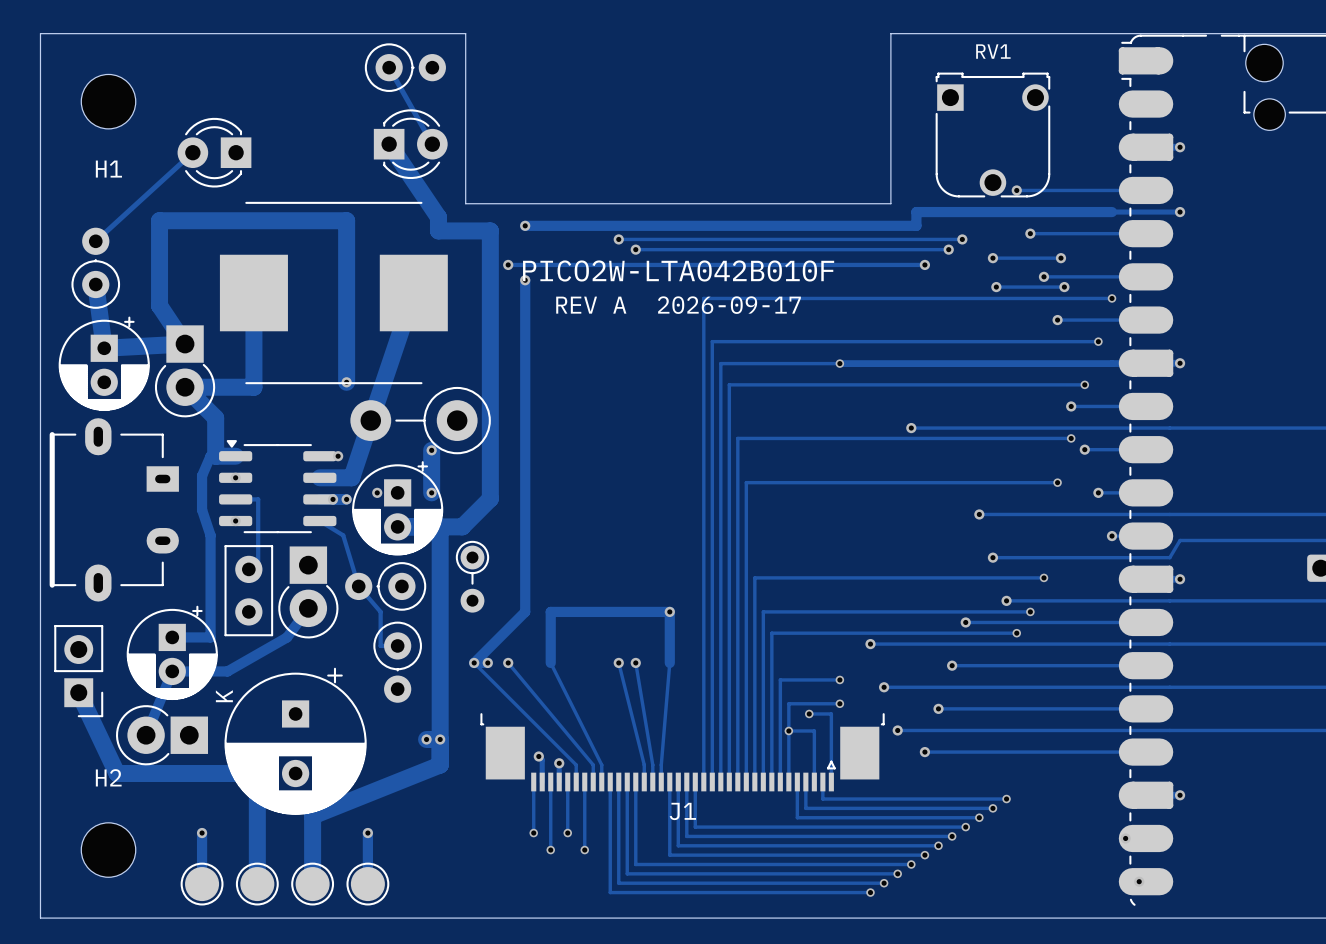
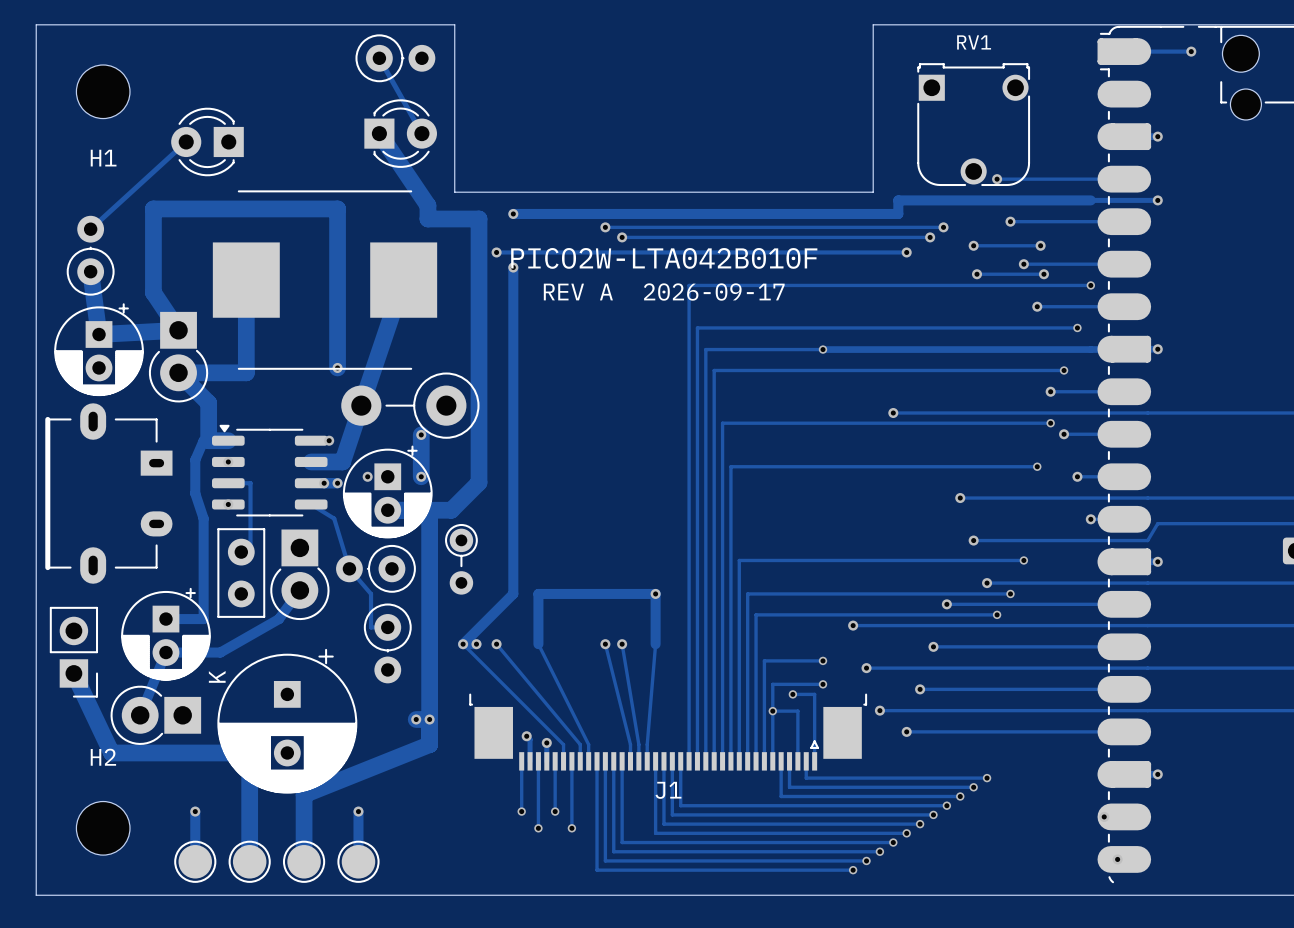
track: none -> (1124, 51) (1191, 51)
via: none -> (1191, 51)

